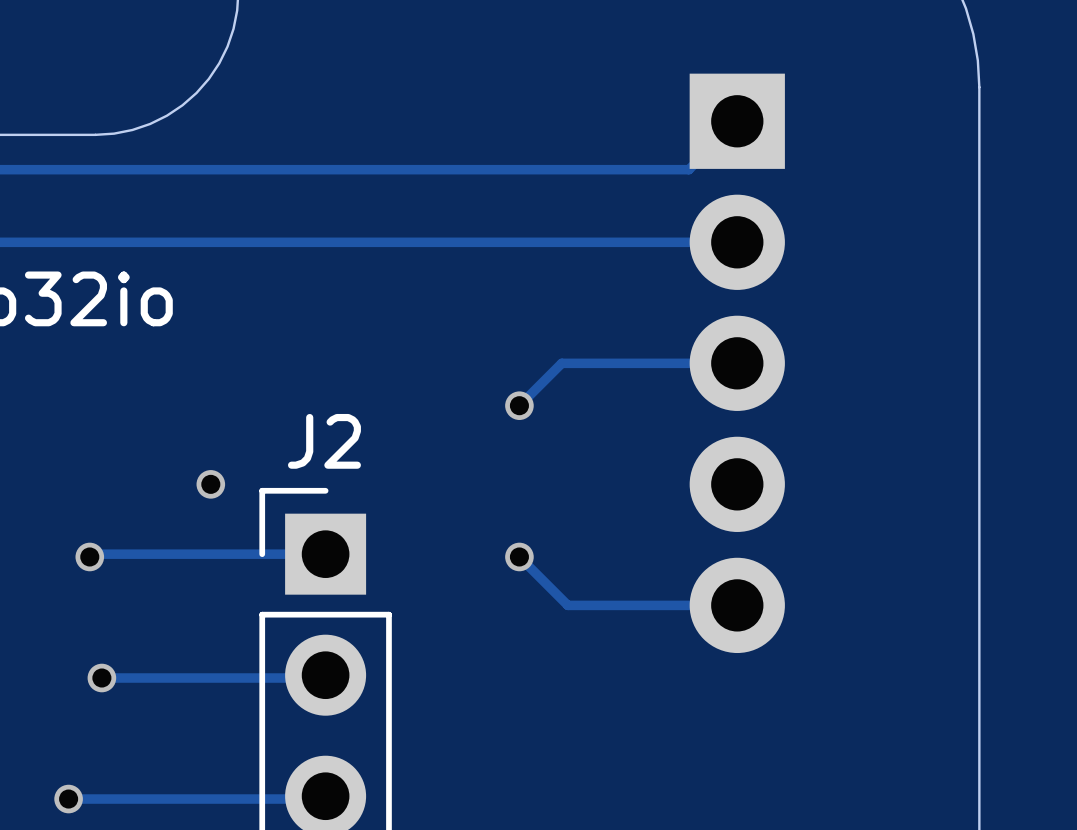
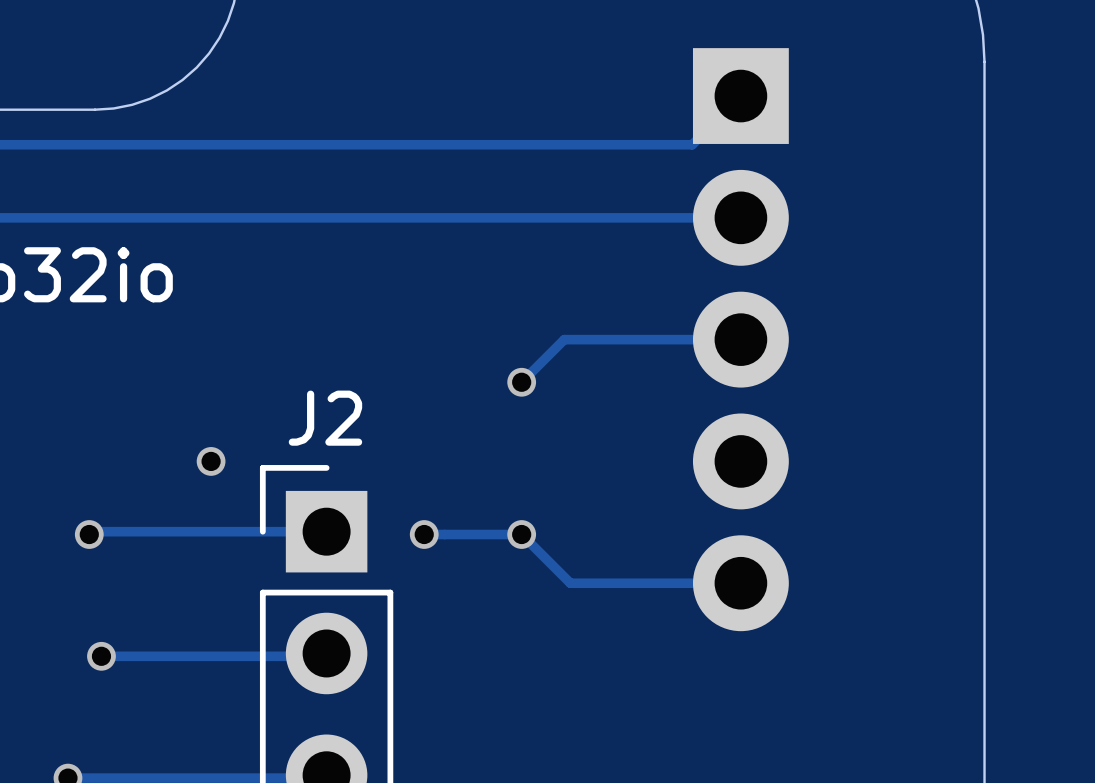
via: none -> (424, 534)
track: none -> (521, 534) (424, 534)

